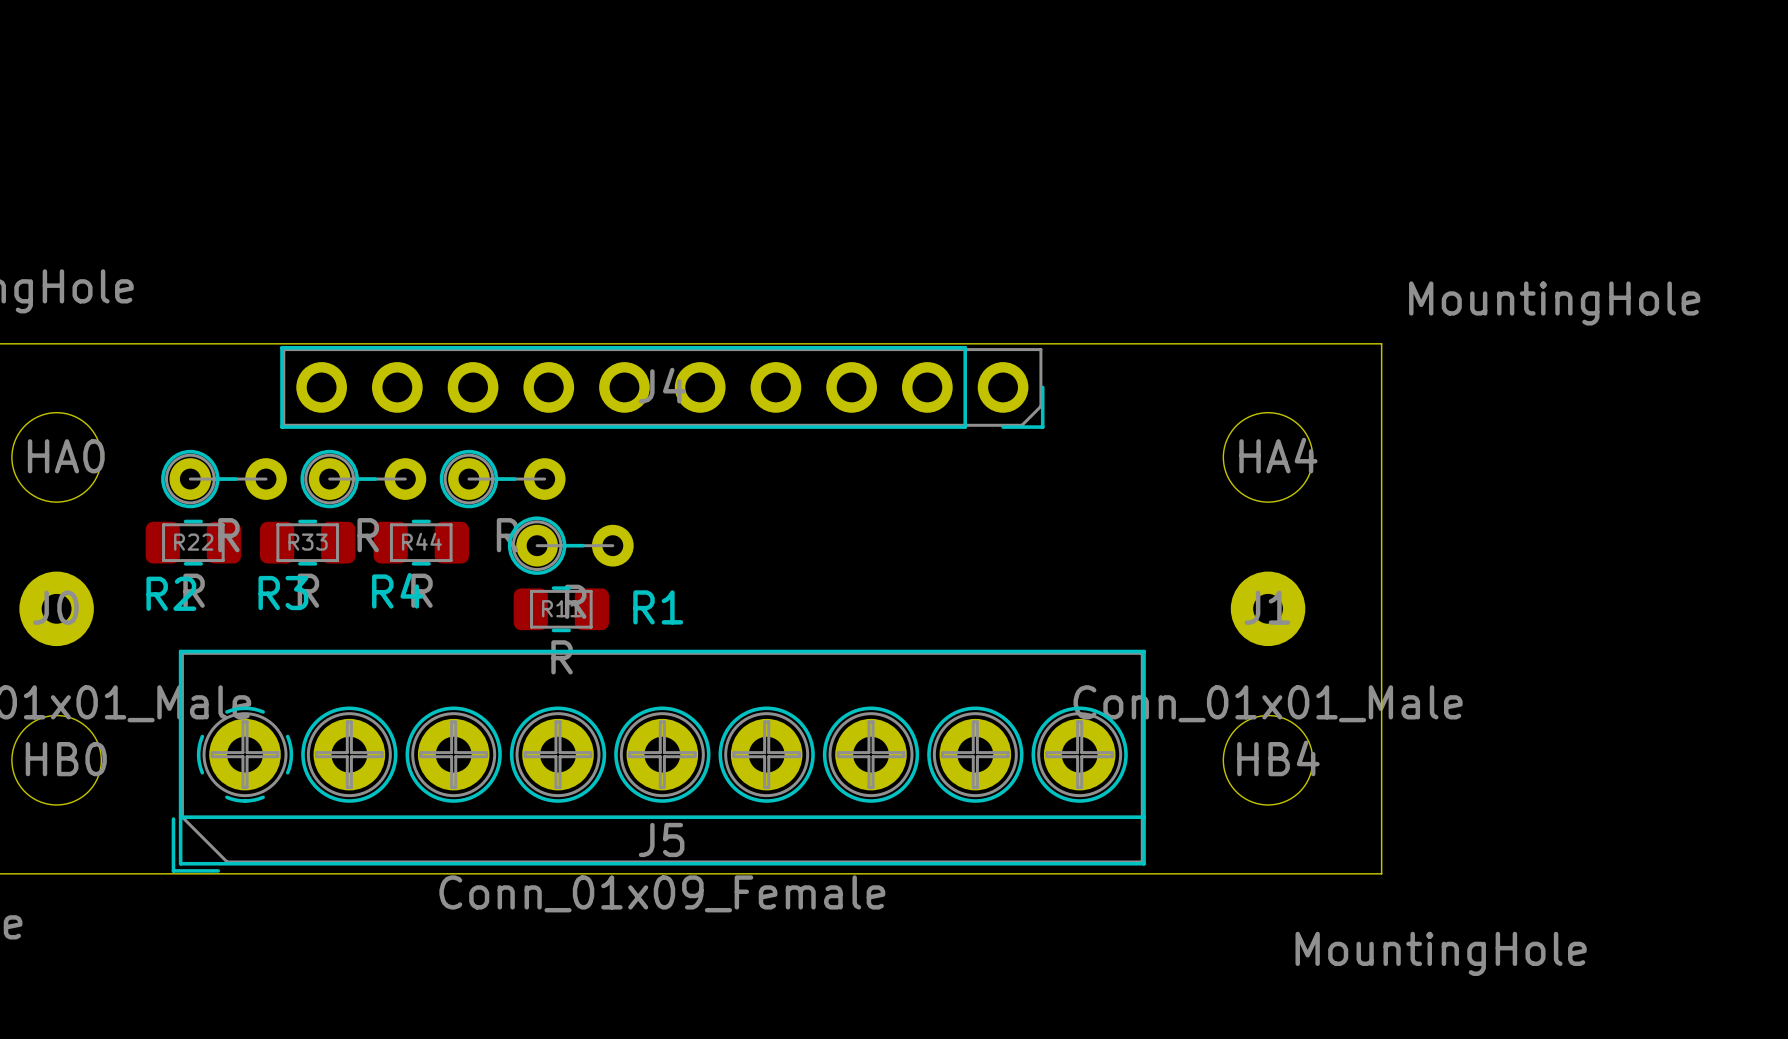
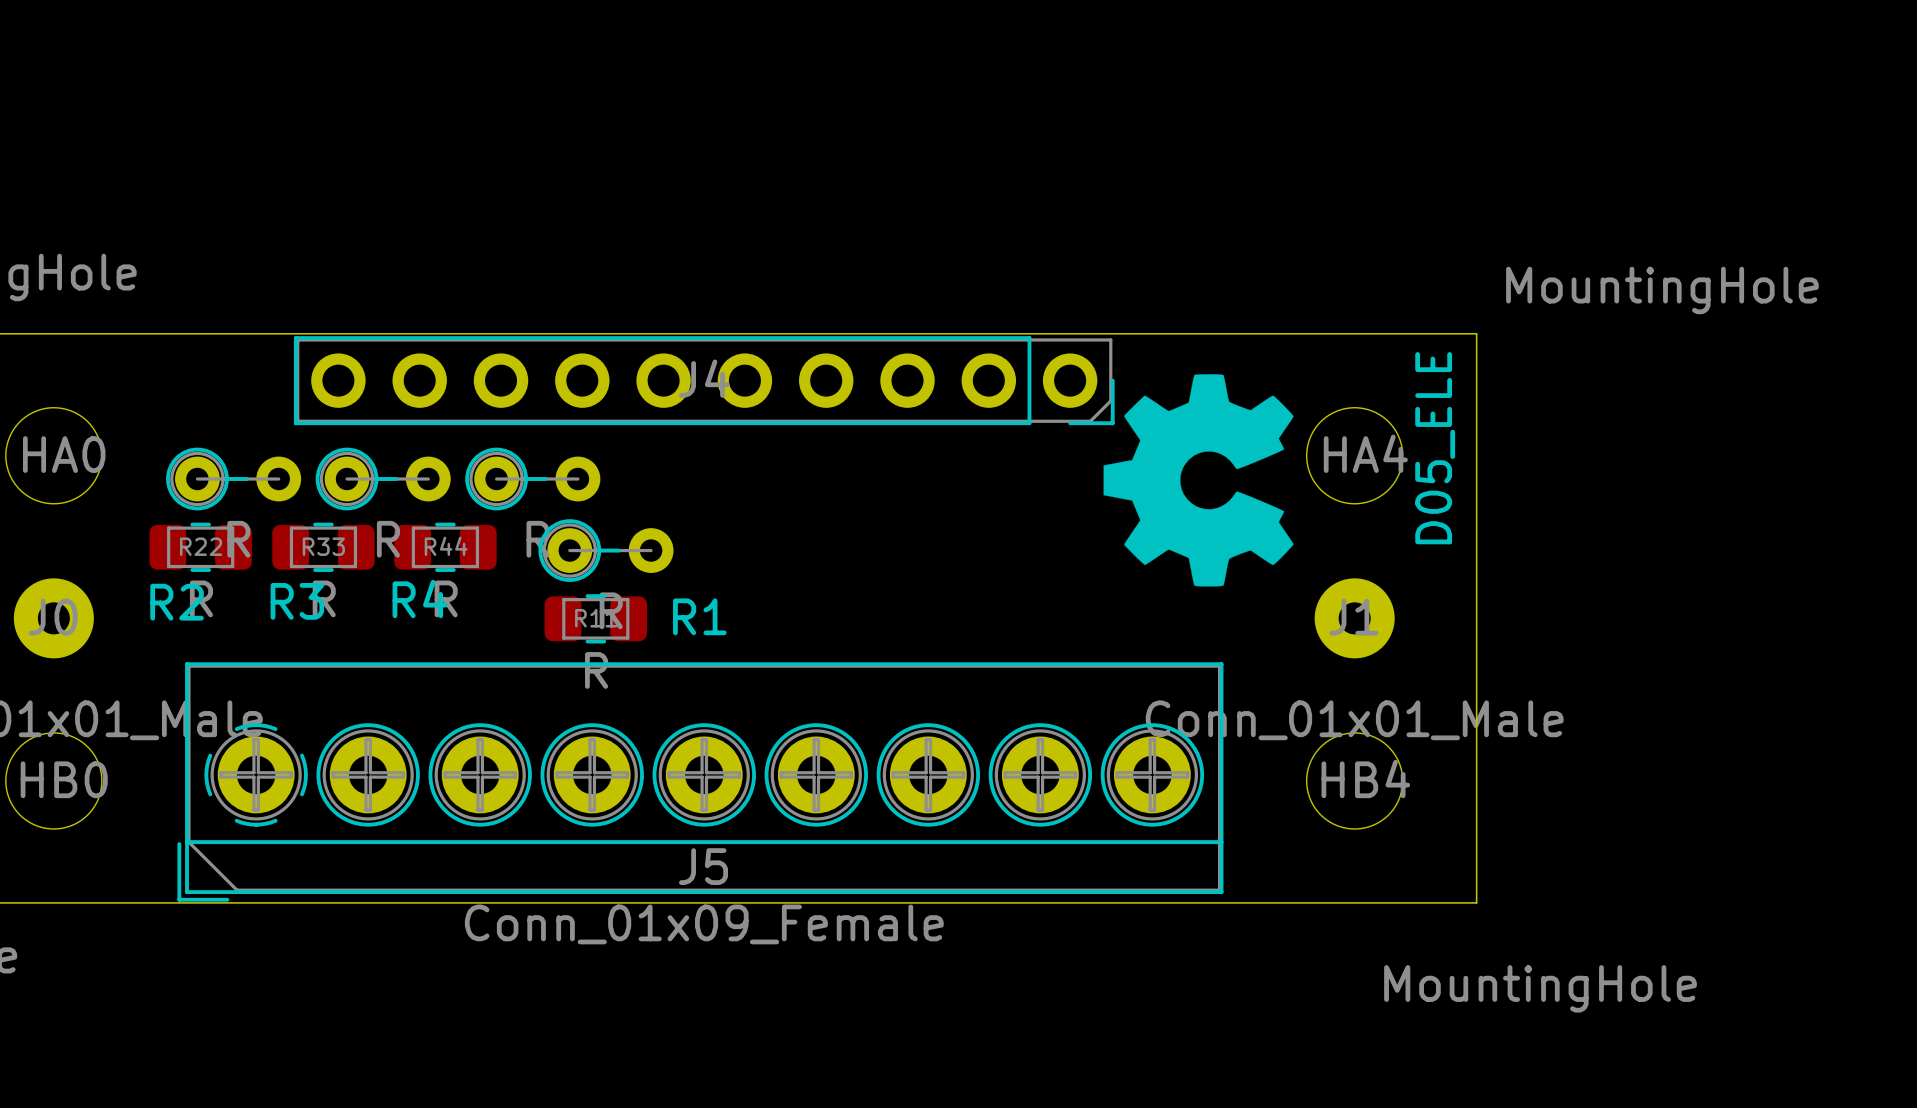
drawing: none -> [1103, 374, 1294, 587]
text: none -> D05_ELE (1435, 448)

